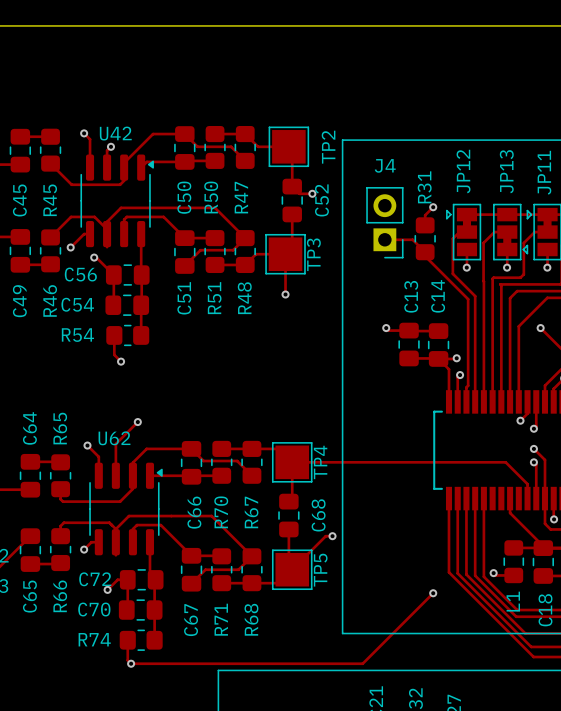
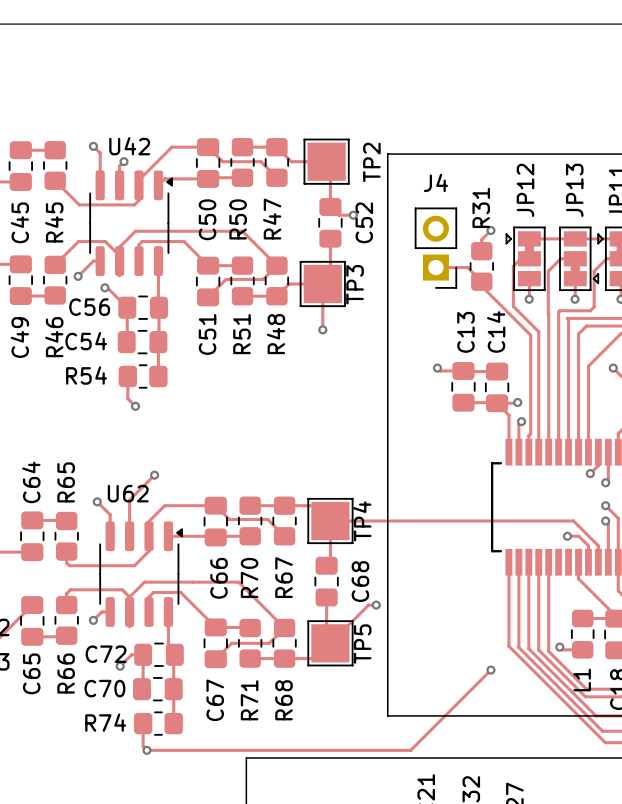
track: none -> (567, 536) (578, 536) (588, 545) (588, 562)
via: none -> (567, 536)

